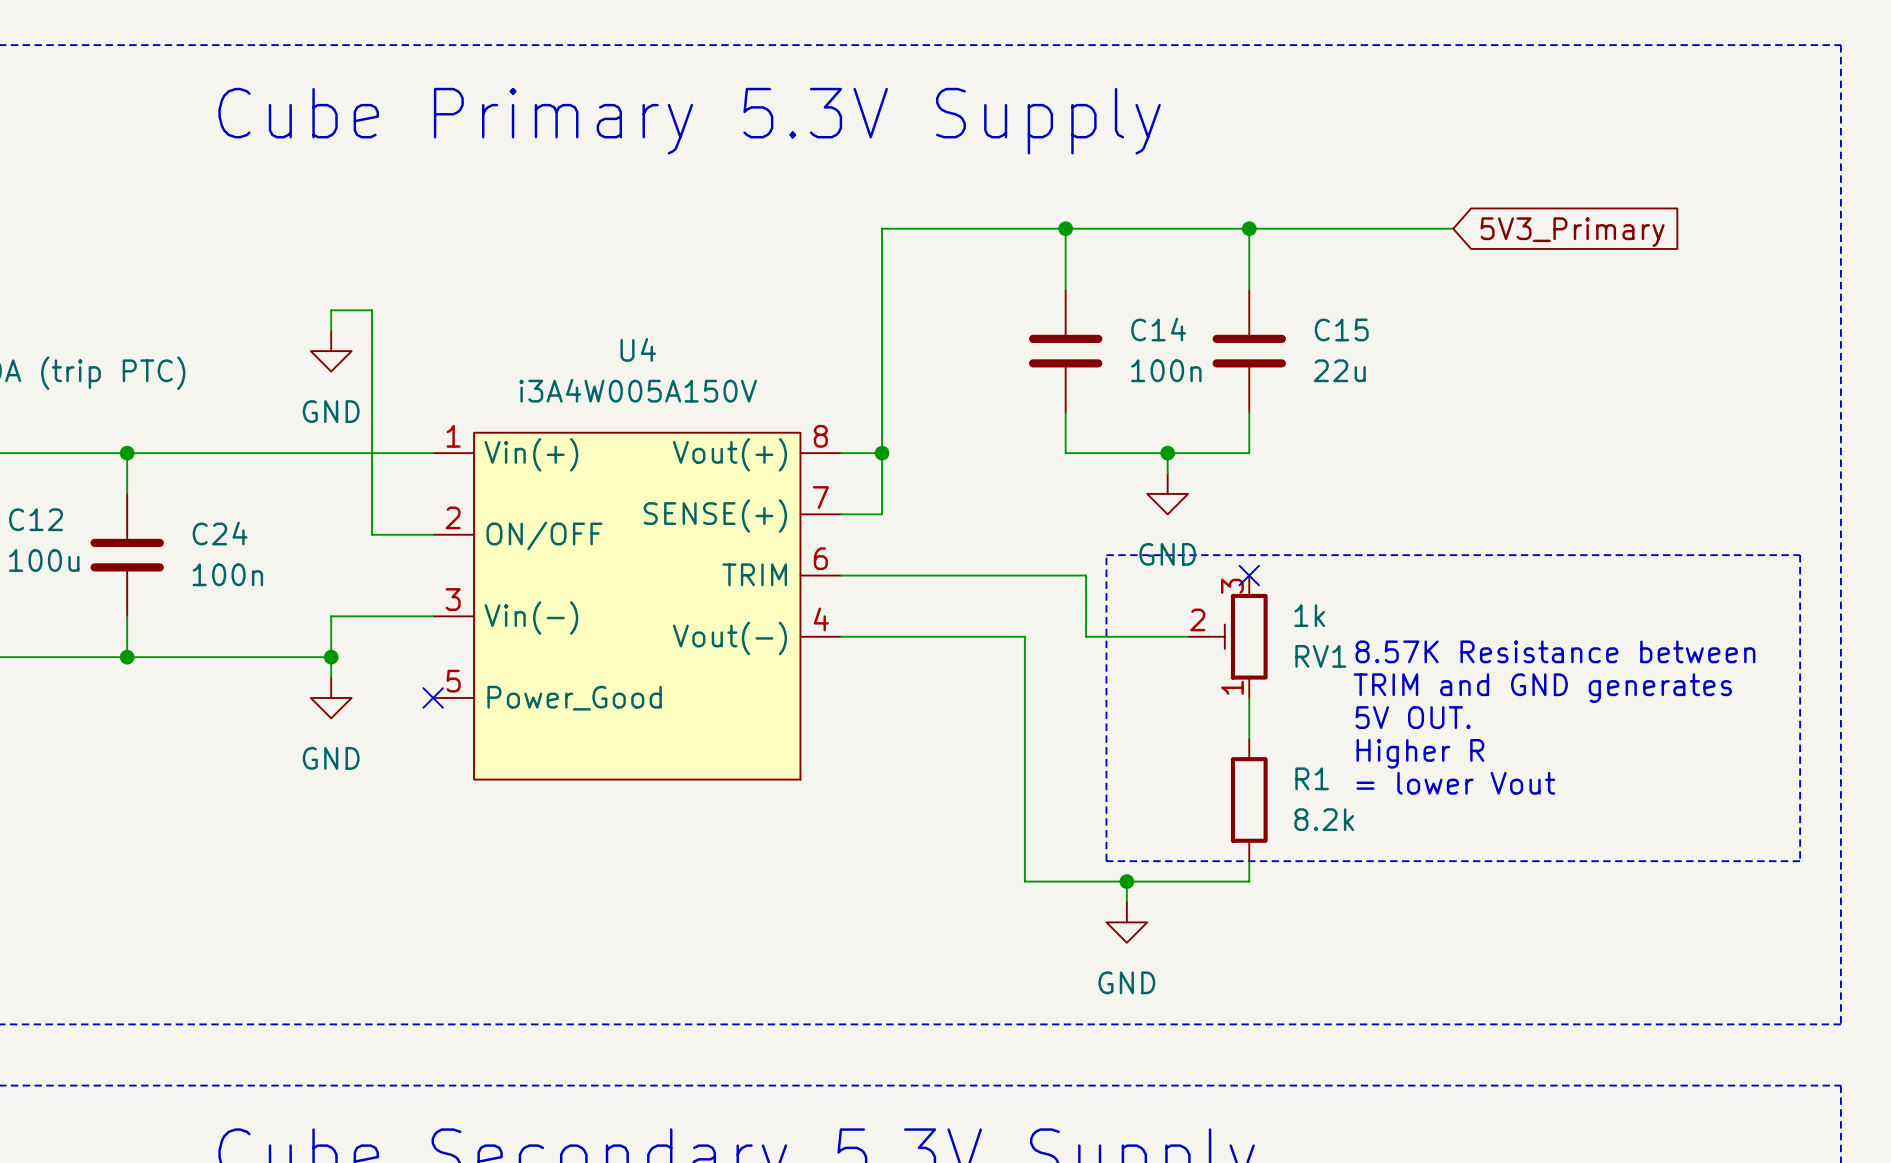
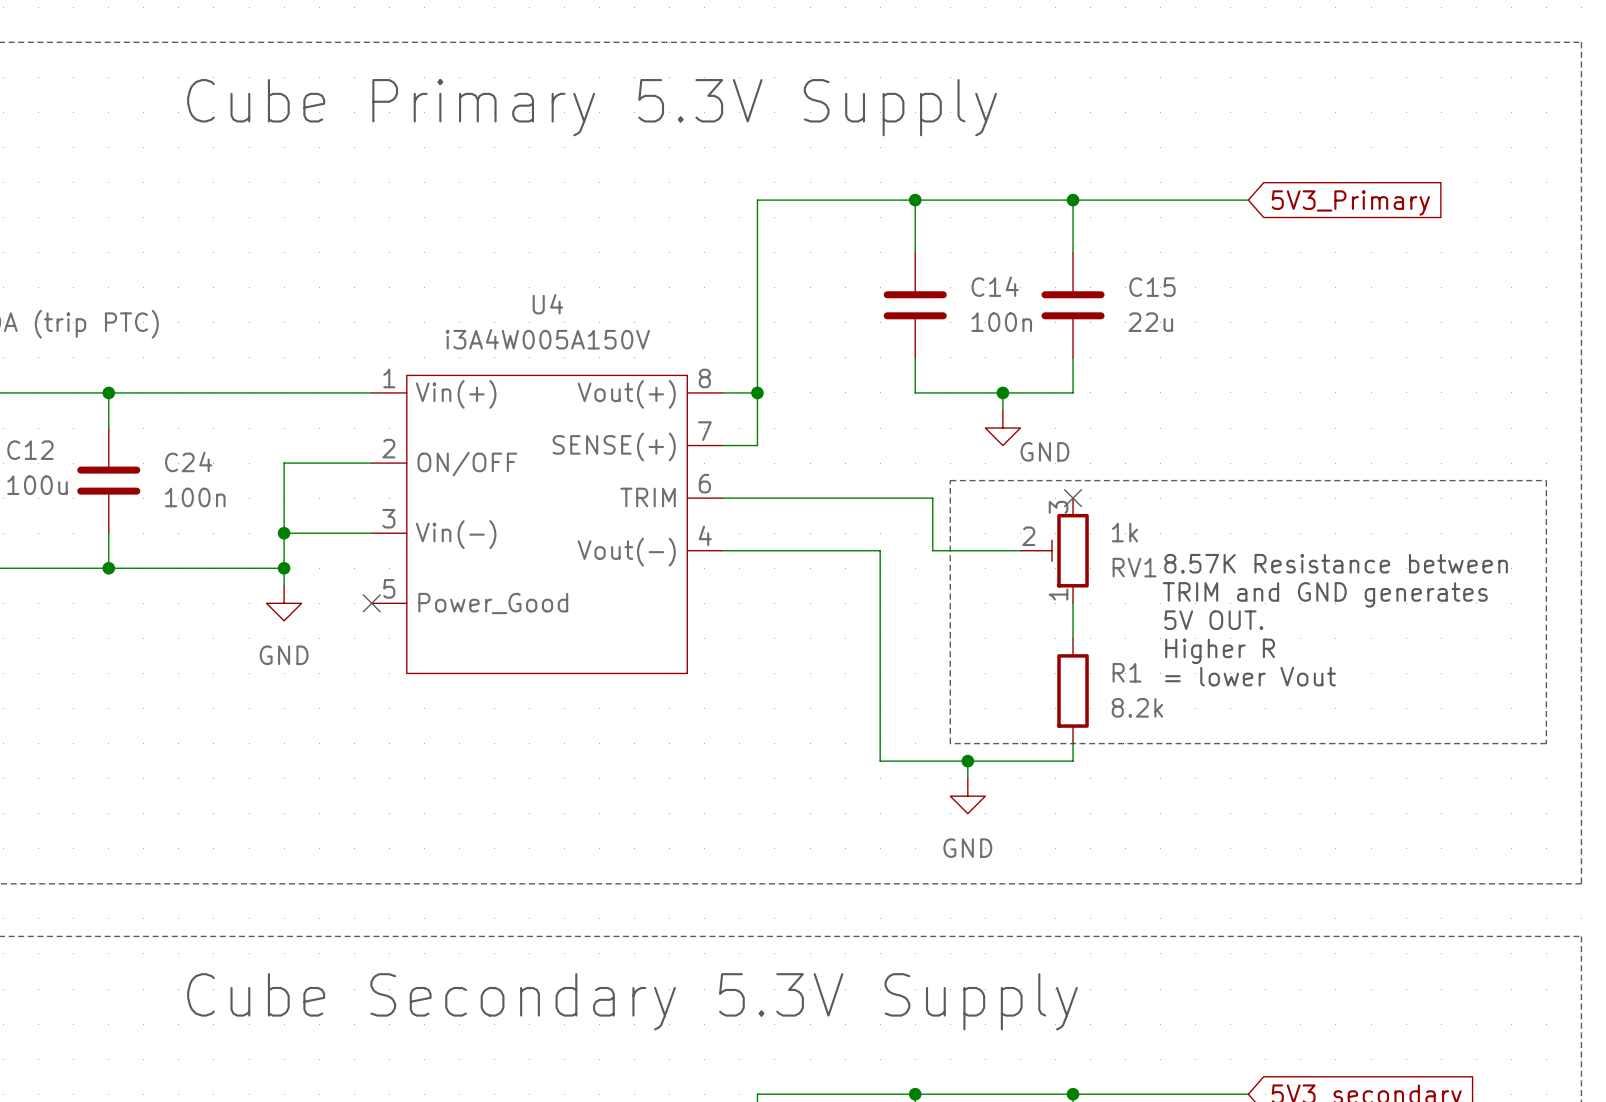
wire: (331, 330) (331, 310) (372, 310) (372, 534) -> (284, 533) (284, 463) (319, 463)
power symbol: GND (331, 351) -> none
power symbol text position: GND (1167, 554) -> GND (1044, 451)
junction: none -> (284, 533)

